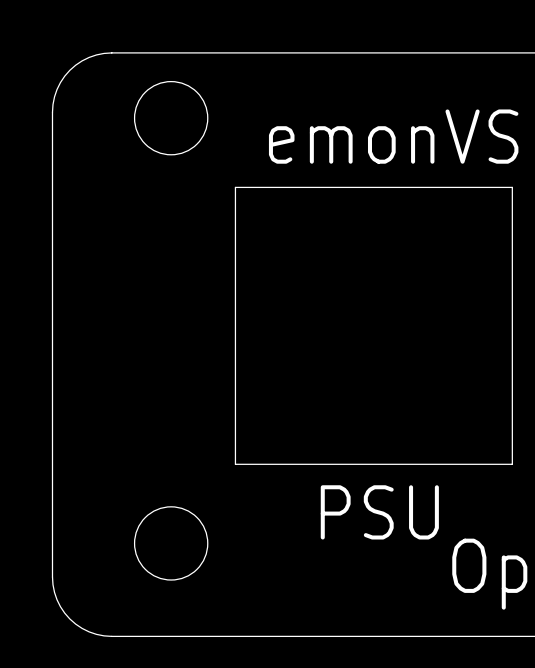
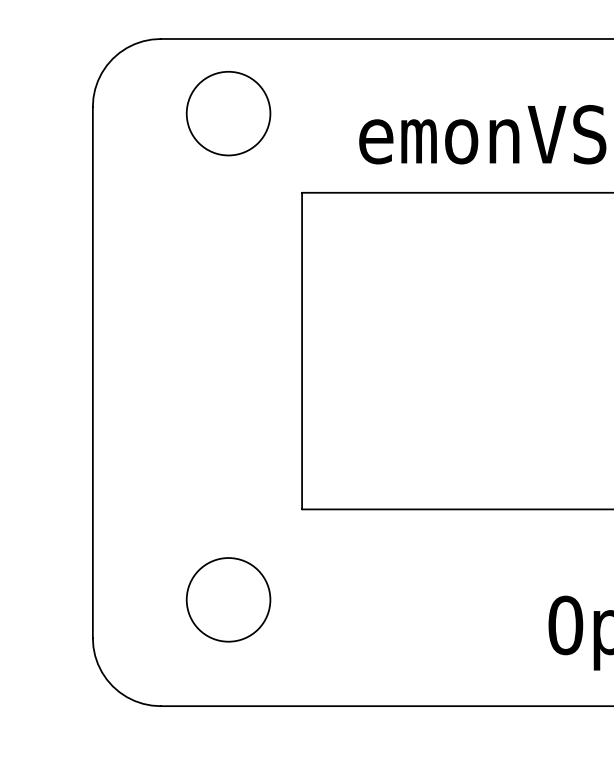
text: PSU (379, 512) -> none

